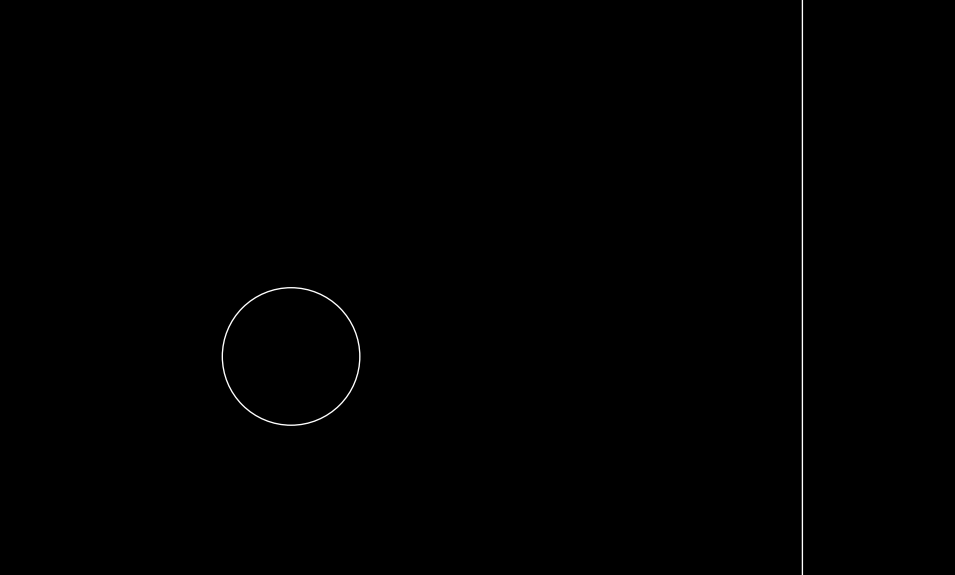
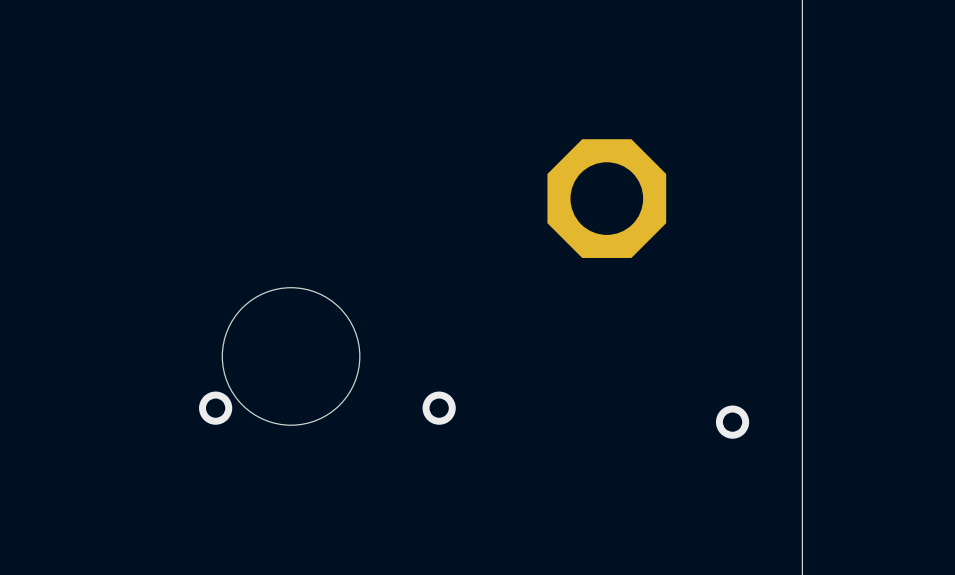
part: none -> (606, 198)
via: none -> (215, 408)
via: none -> (439, 408)
via: none -> (732, 422)

